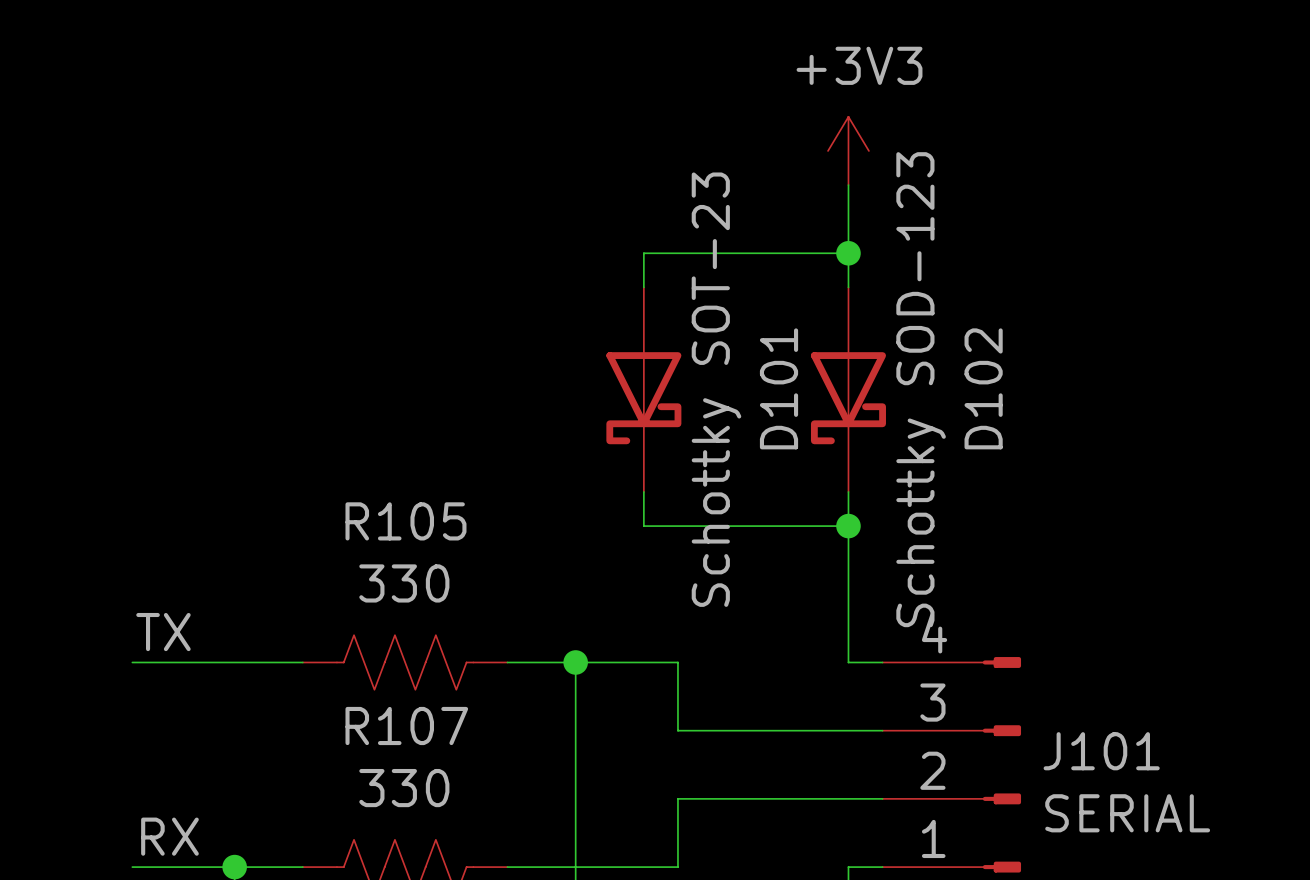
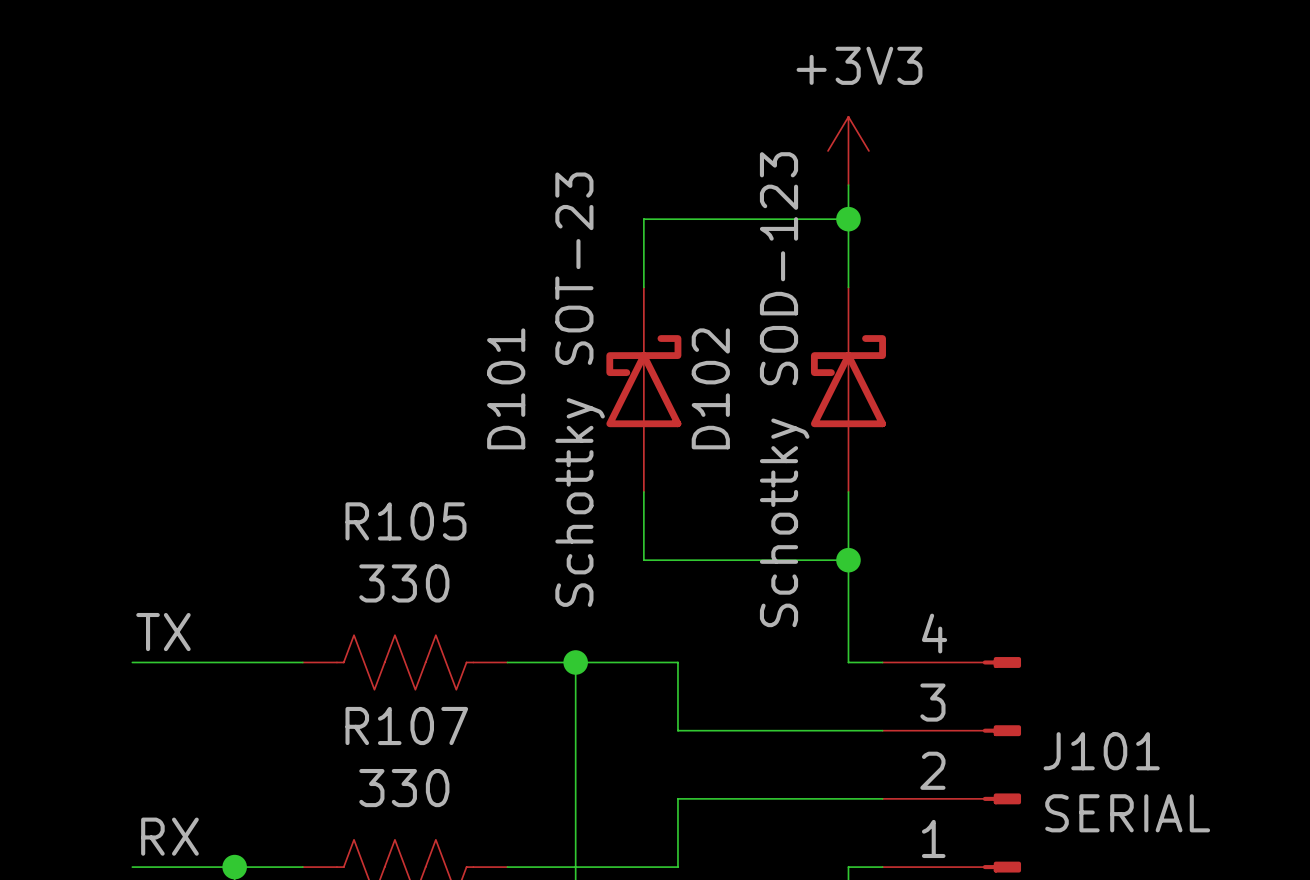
wire: (643, 253) (848, 253) -> (643, 253) (643, 219) (848, 219)
junction position: (848, 253) -> (848, 219)
D101 rotation: 0° (643, 398) -> 180° (643, 381)
D102 rotation: 0° (848, 398) -> 180° (848, 381)
wire: (643, 526) (848, 526) -> (643, 526) (643, 560) (848, 560)
junction position: (848, 526) -> (848, 560)

